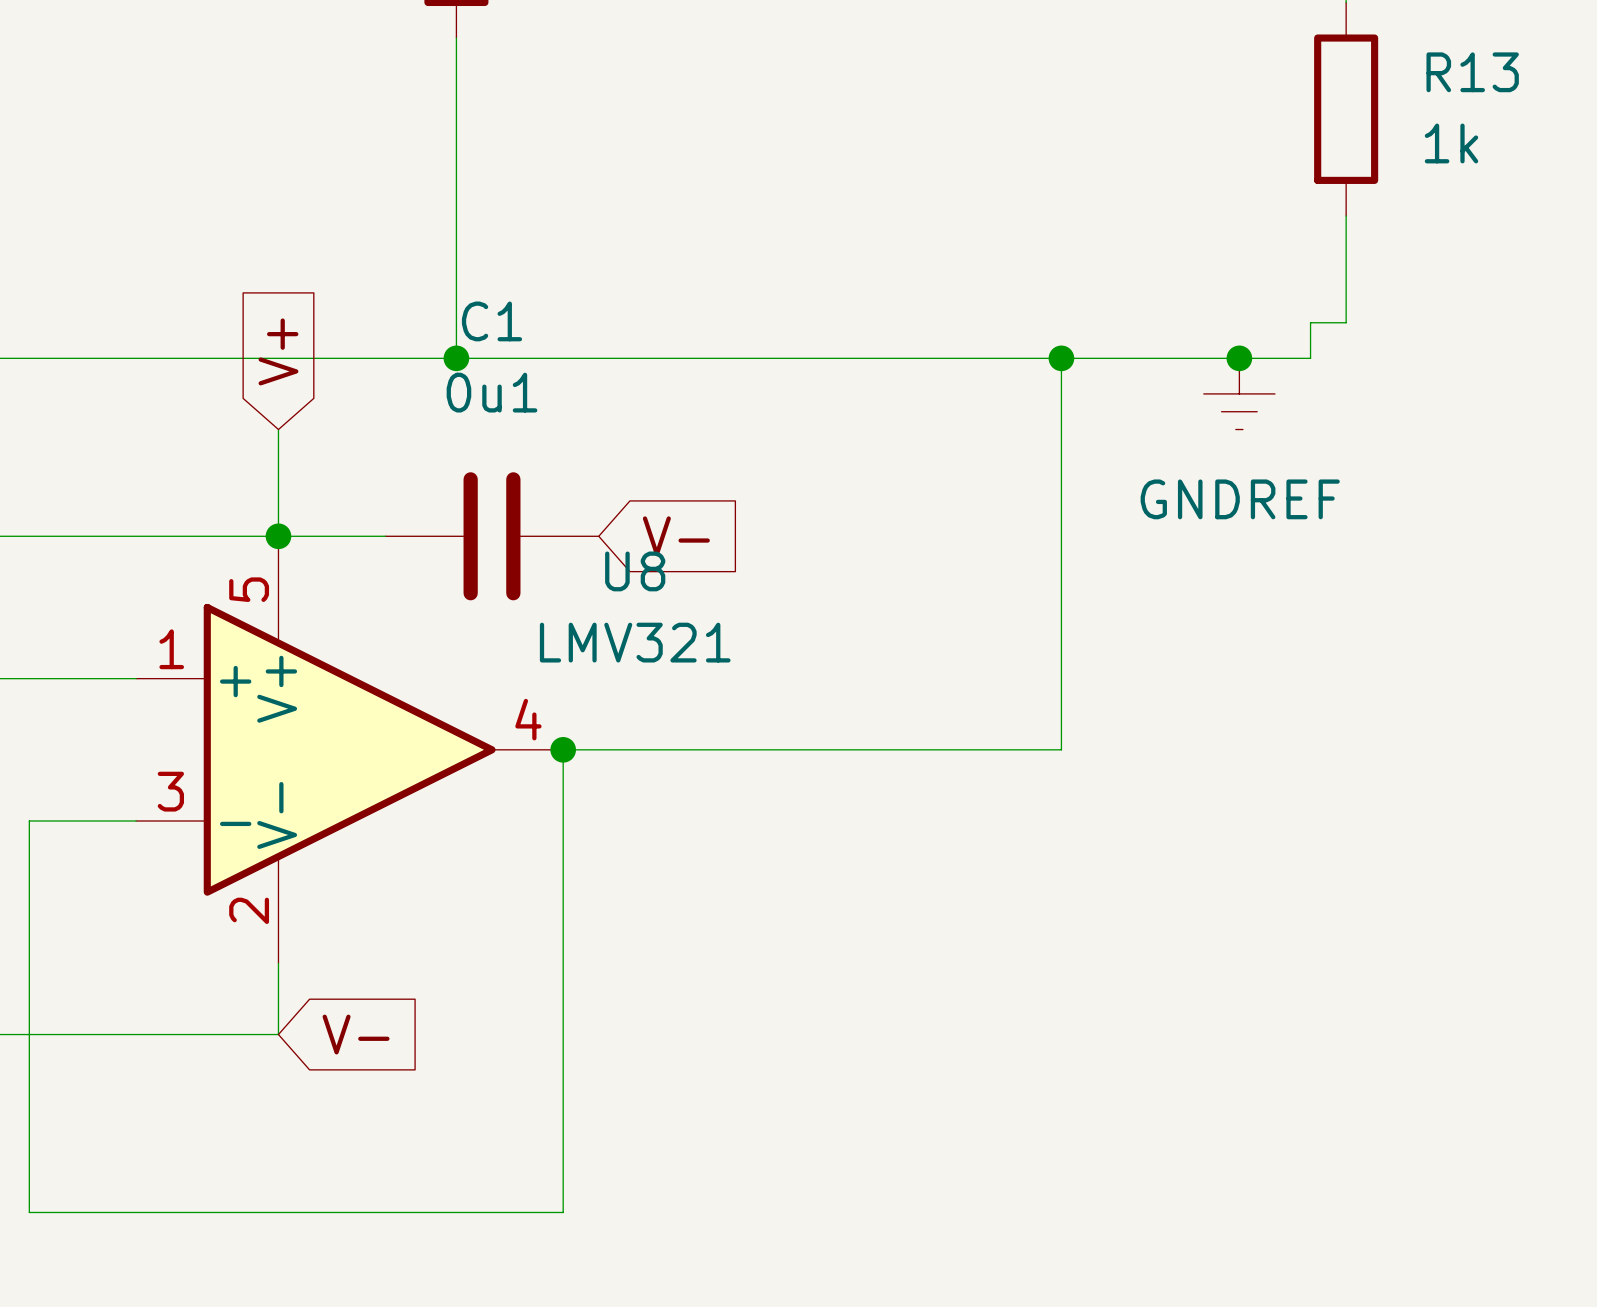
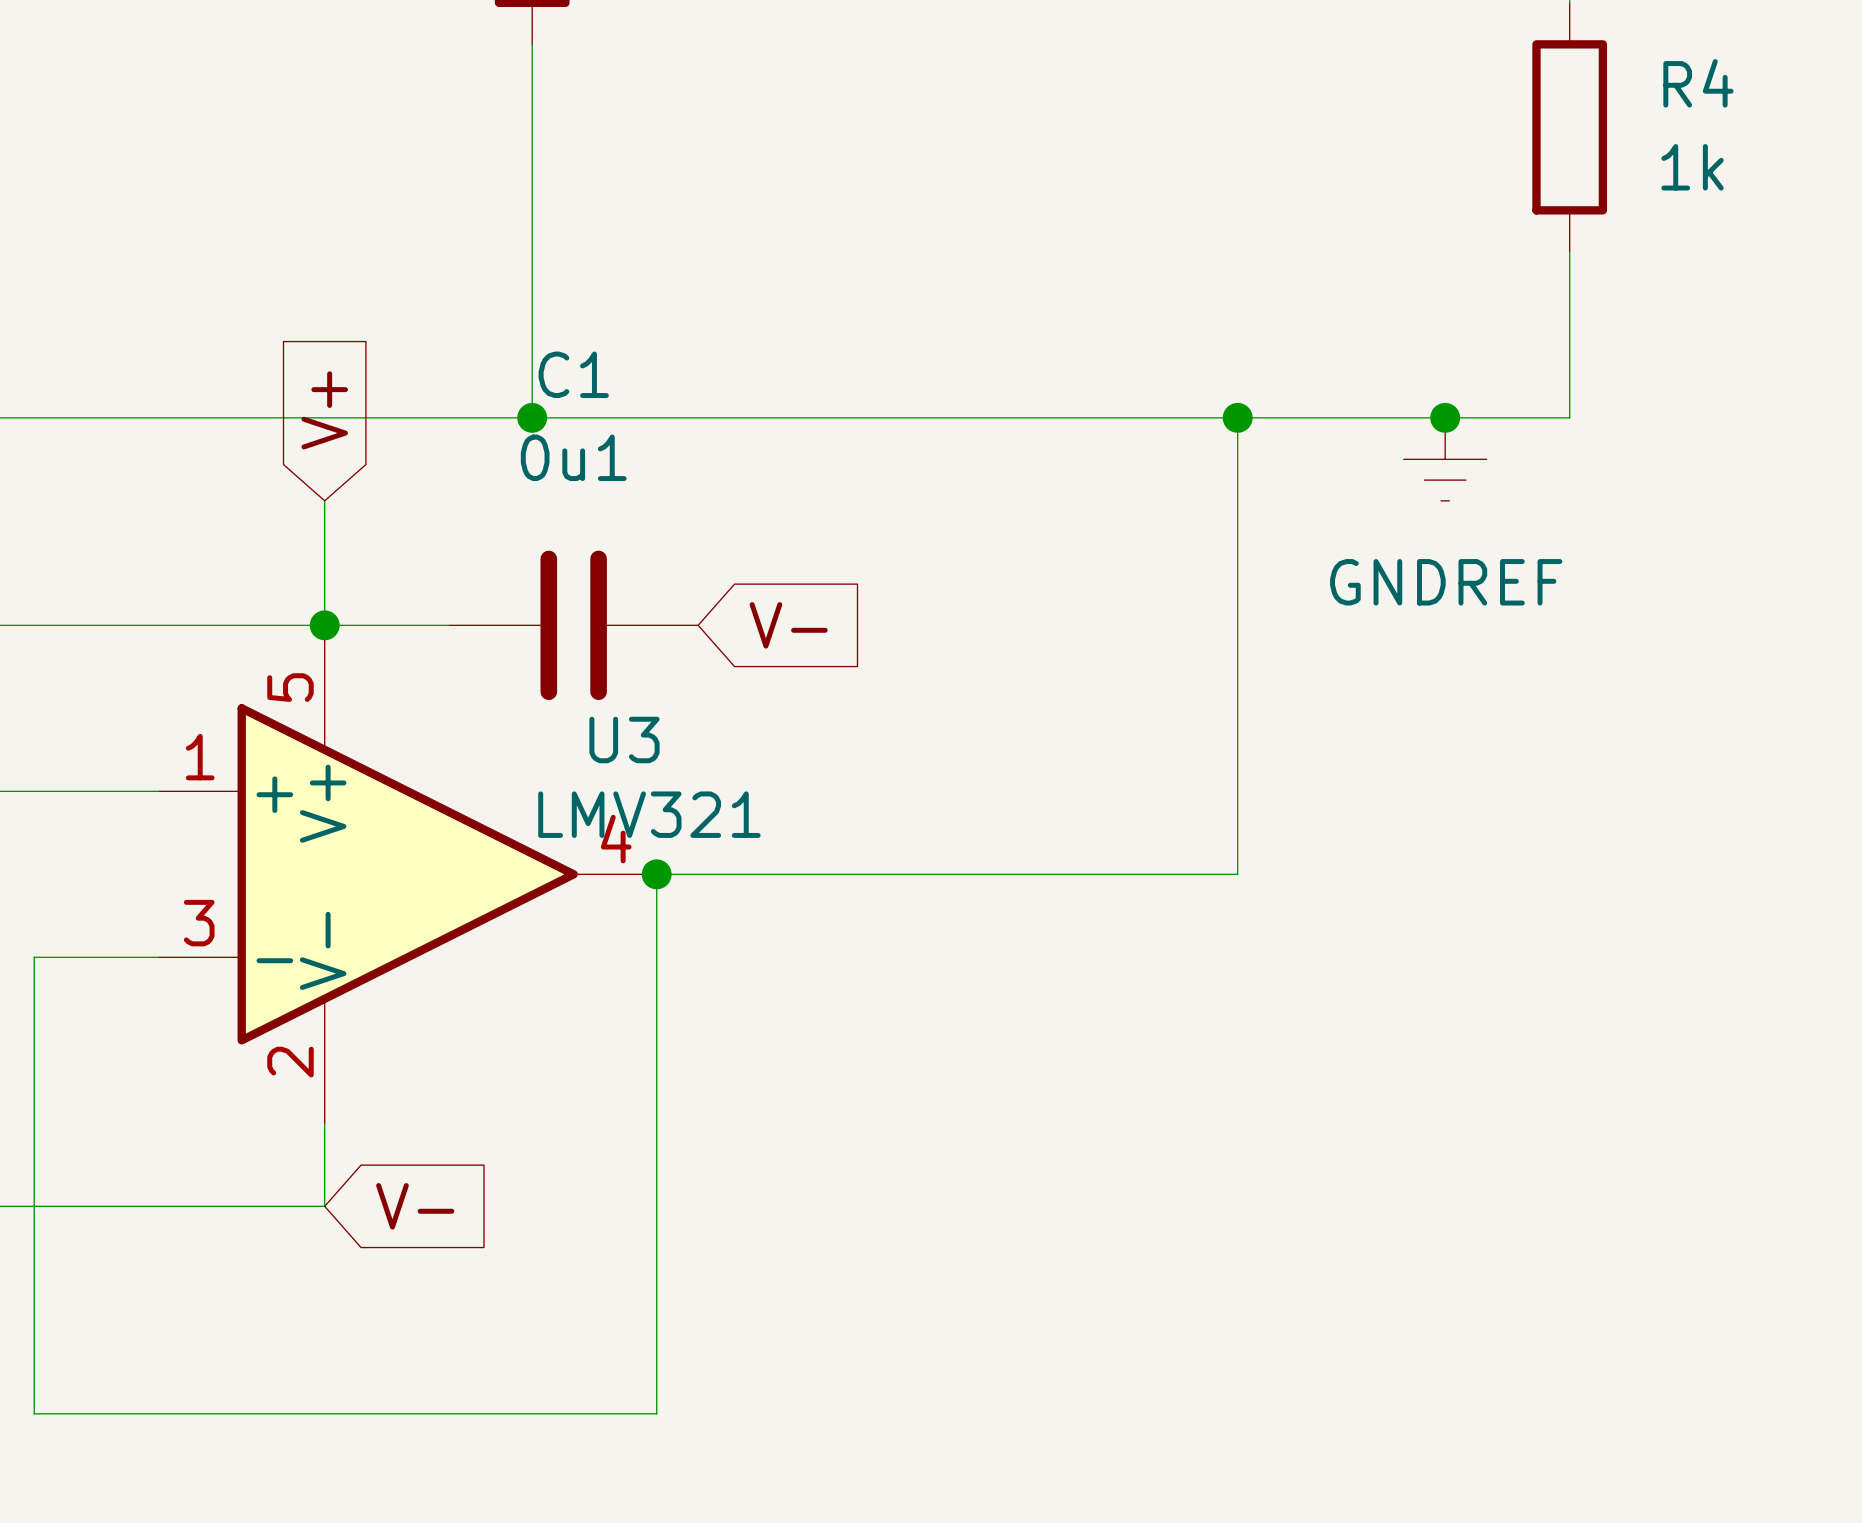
R13 name: R13 (1472, 72) -> R4 (1698, 83)
wire: (1346, 322) (1310, 322) (1310, 358) -> (1569, 376) (1569, 417) (1528, 417)
U8 name: U8 (635, 571) -> U3 (624, 739)
U8 value position: LMV321 (635, 642) -> LMV321 (649, 814)

